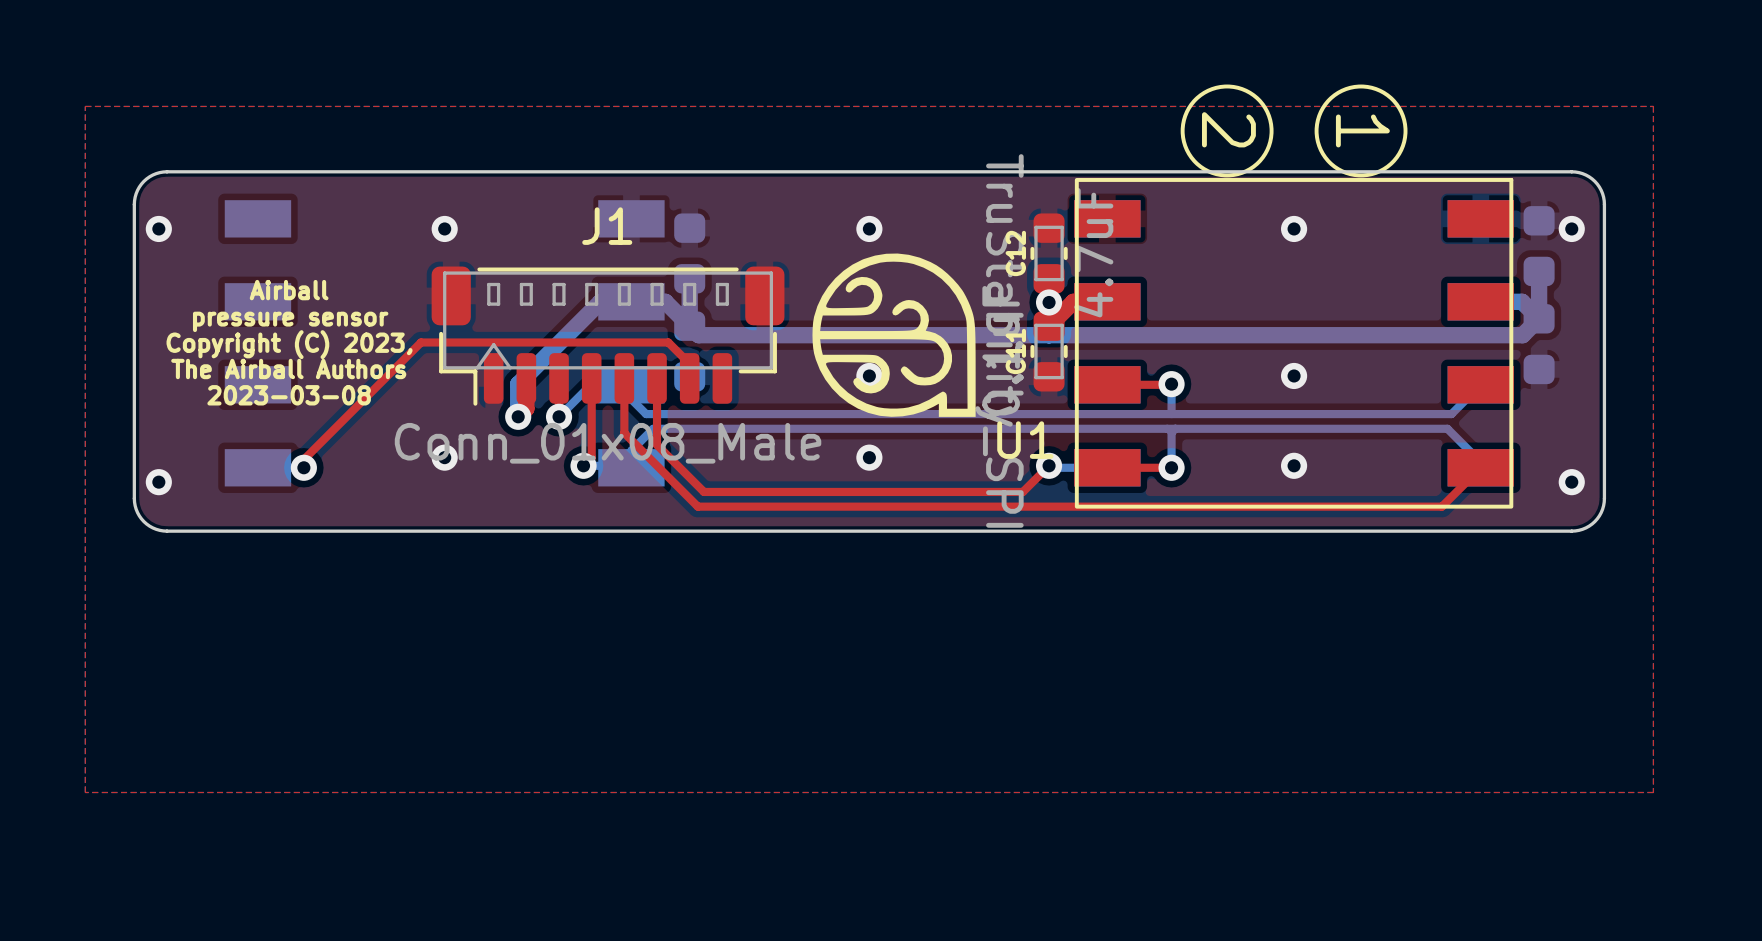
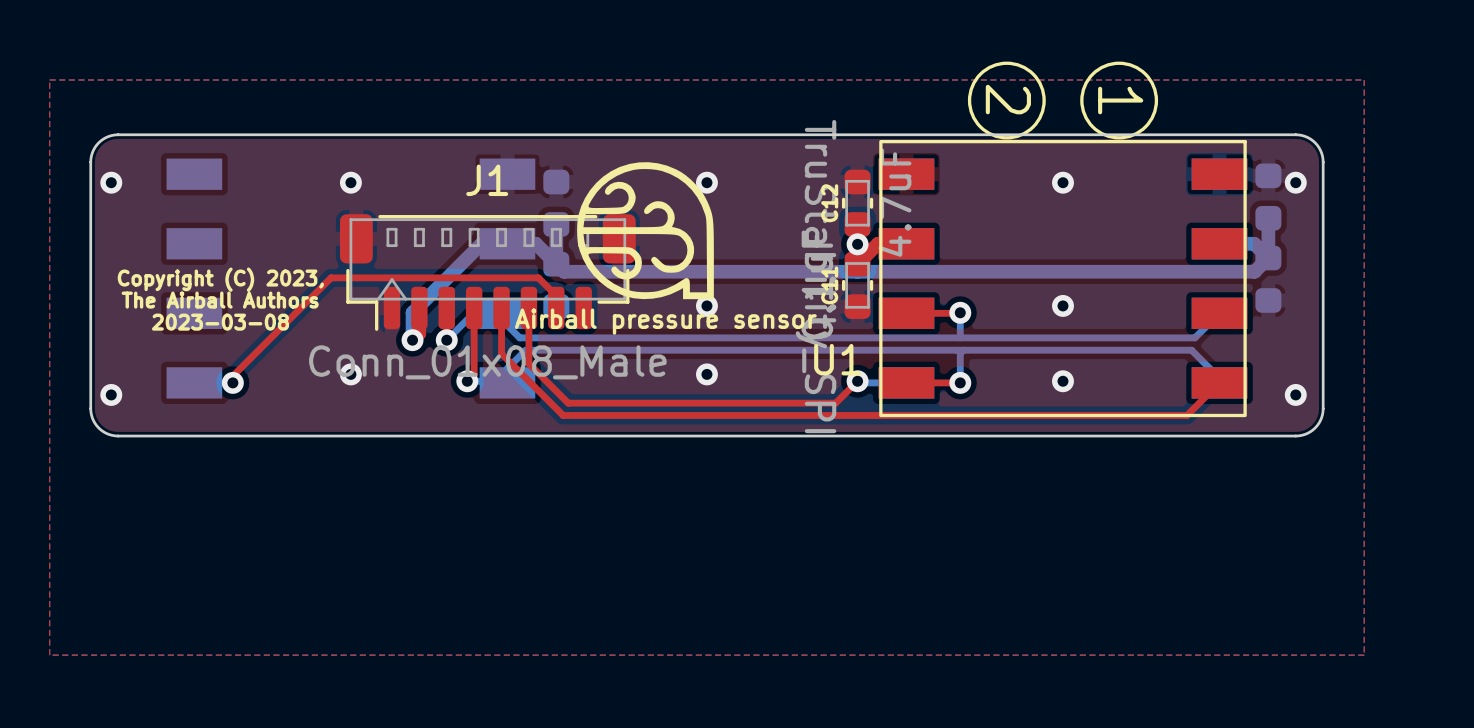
text: Airball (289, 290) -> none
text: pressure sensor (290, 321) -> none
drawing position: (894, 335) -> (645, 230)
text: none -> Airball pressure sensor (665, 321)

